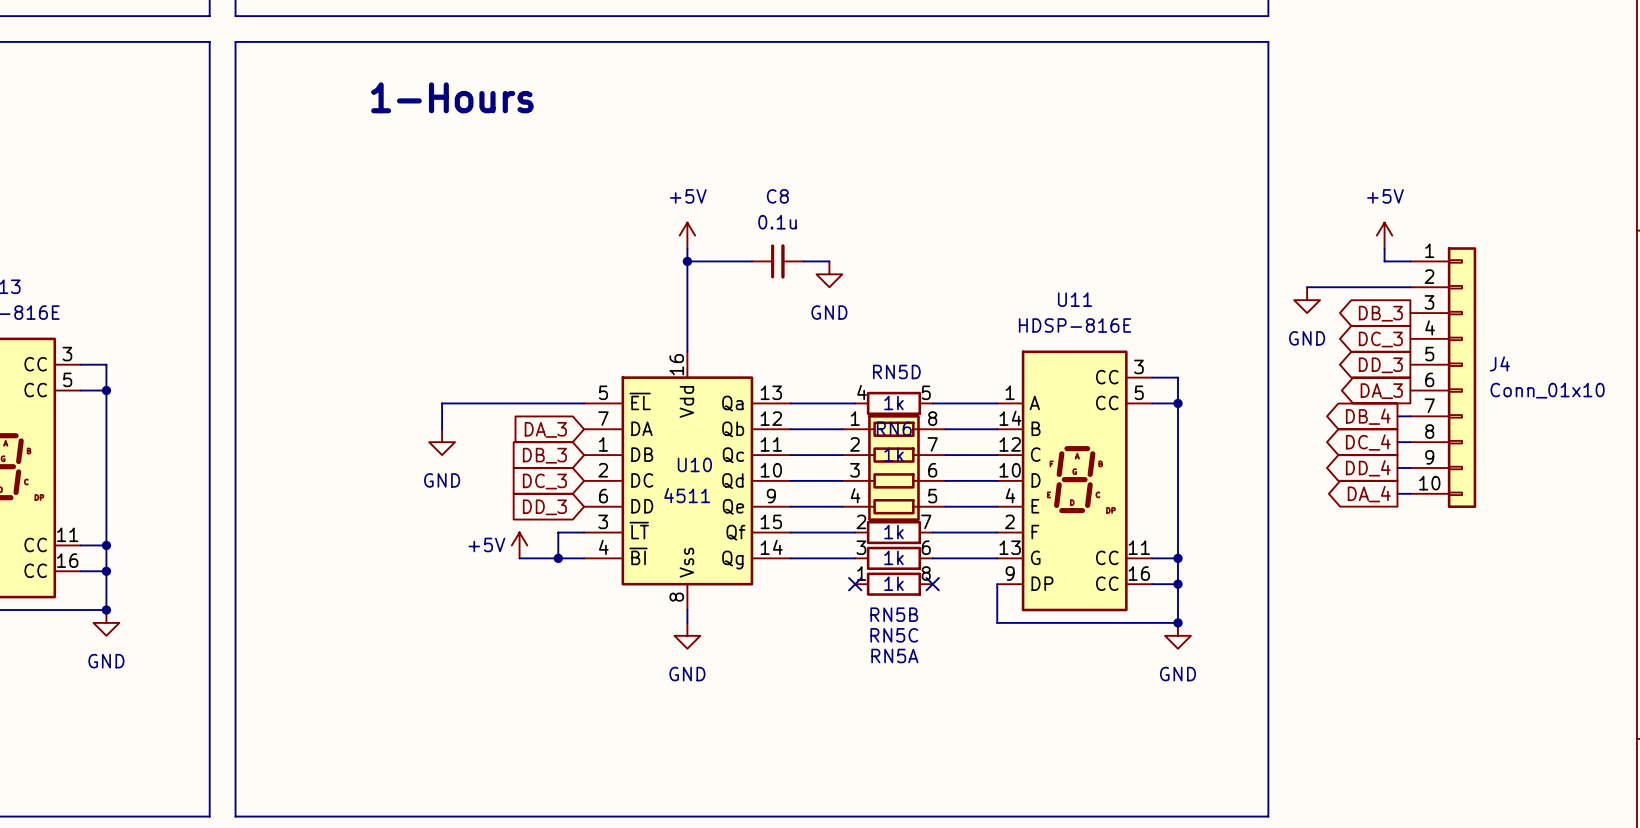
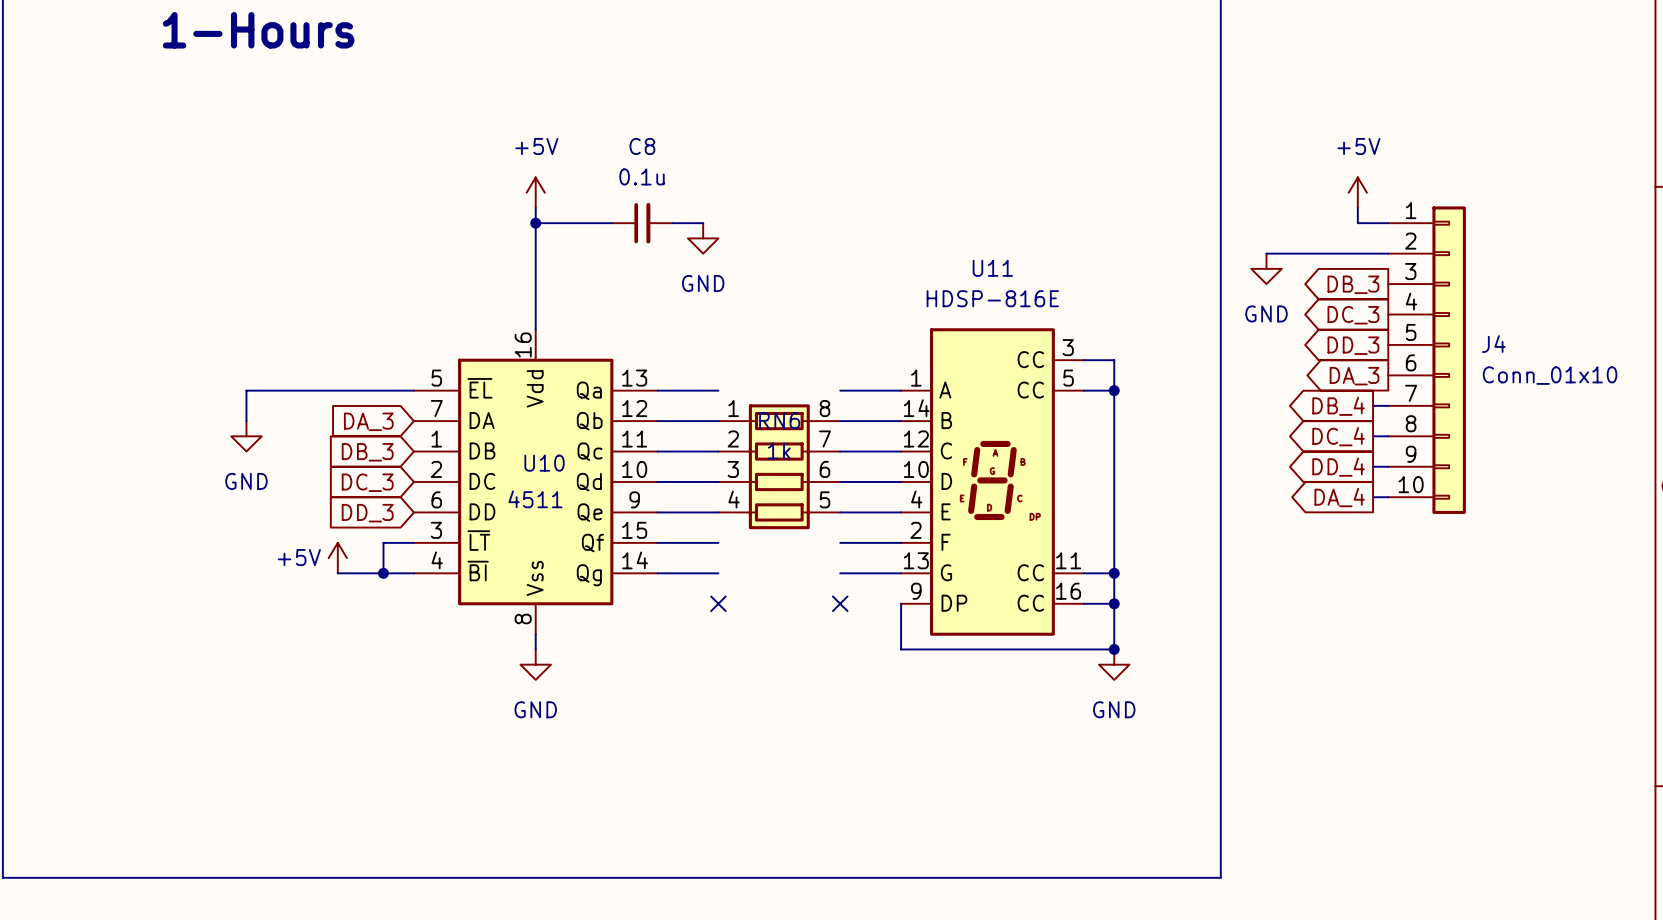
wire: (842, 403) (855, 403) -> none
RN5D: 1k (893, 403) -> none
wire: (932, 403) (945, 403) -> none
wire: (842, 532) (855, 532) -> none
RN5B: 1k (893, 532) -> none
wire: (932, 532) (945, 532) -> none
wire: (842, 558) (855, 558) -> none
RN5C: 1k (893, 558) -> none
wire: (932, 558) (945, 558) -> none
no-connect mark position: (855, 584) -> (718, 603)
RN5A: 1k (893, 584) -> none
no-connect mark position: (932, 584) -> (840, 603)

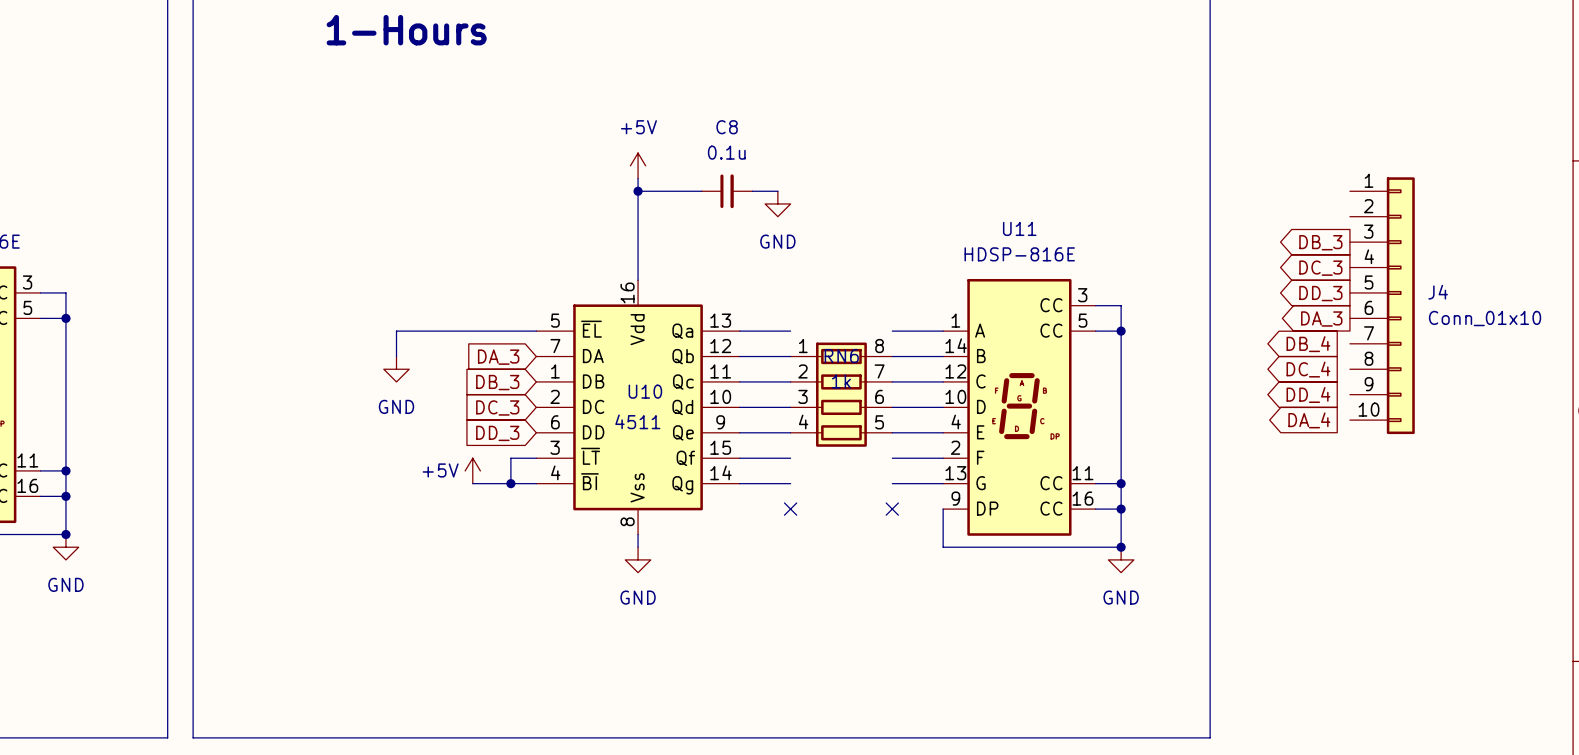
power symbol: +5V (1357, 192) -> none
wire: (1357, 207) (1357, 223) (1388, 223) -> none
wire: (1266, 253) (1388, 253) -> none
power symbol: GND (1266, 268) -> none
wire: (1373, 405) (1388, 405) -> none
wire: (1373, 436) (1388, 436) -> none
wire: (1373, 466) (1388, 466) -> none
wire: (1373, 497) (1388, 497) -> none

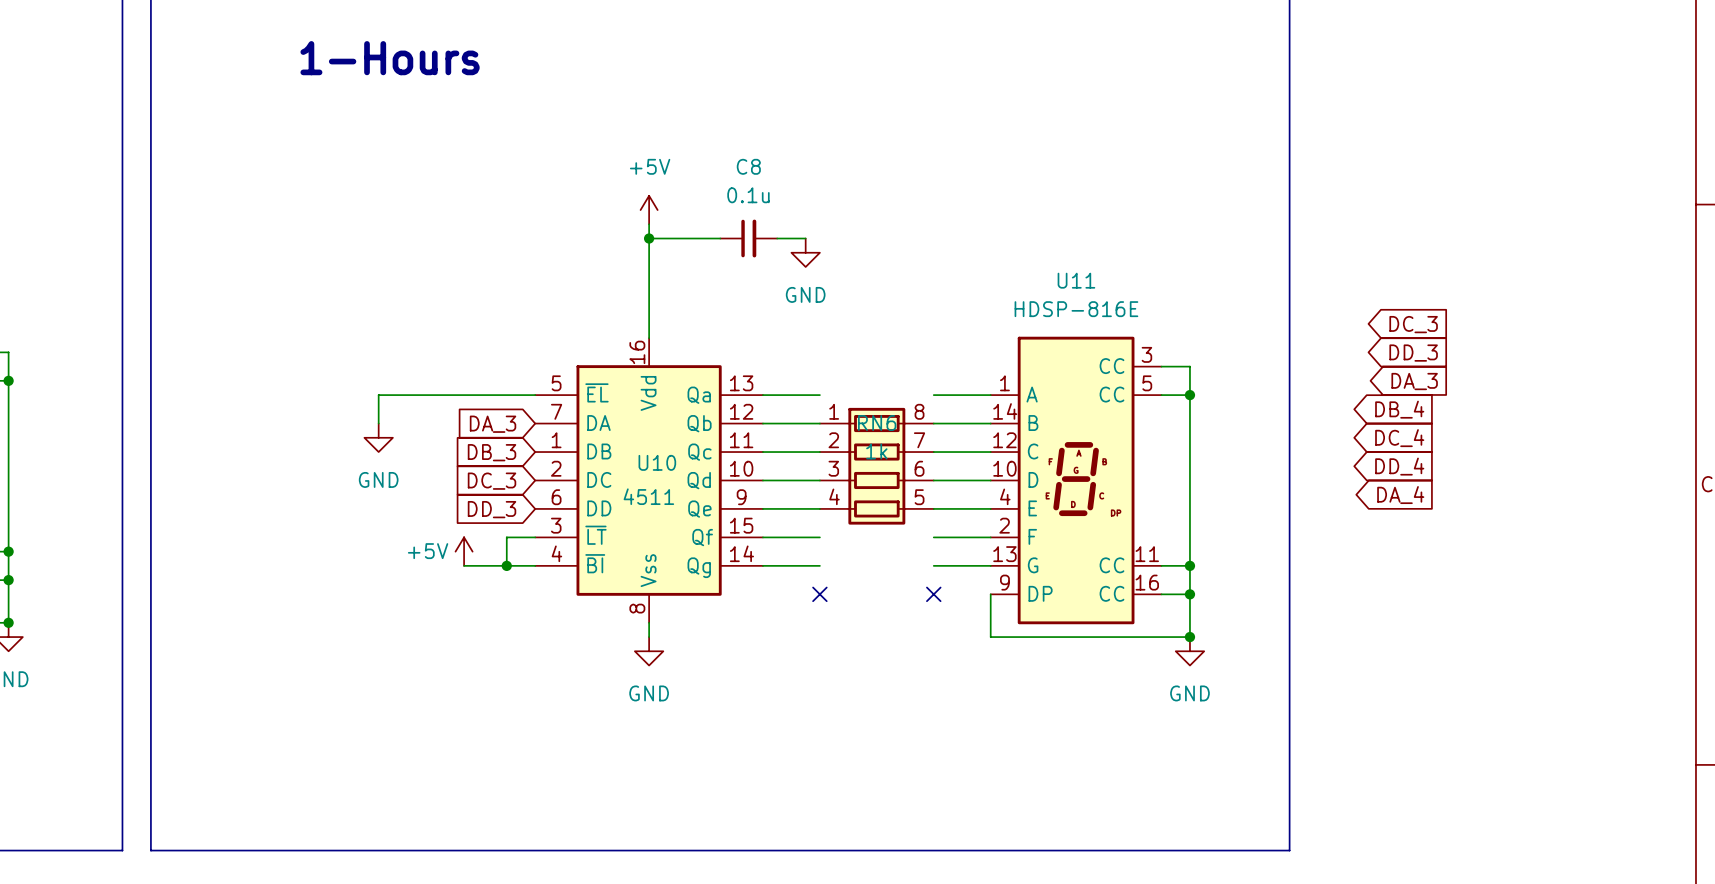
global label: DB_3 (1320, 242) -> none
J4: Conn_01x10 (1382, 305) -> none

